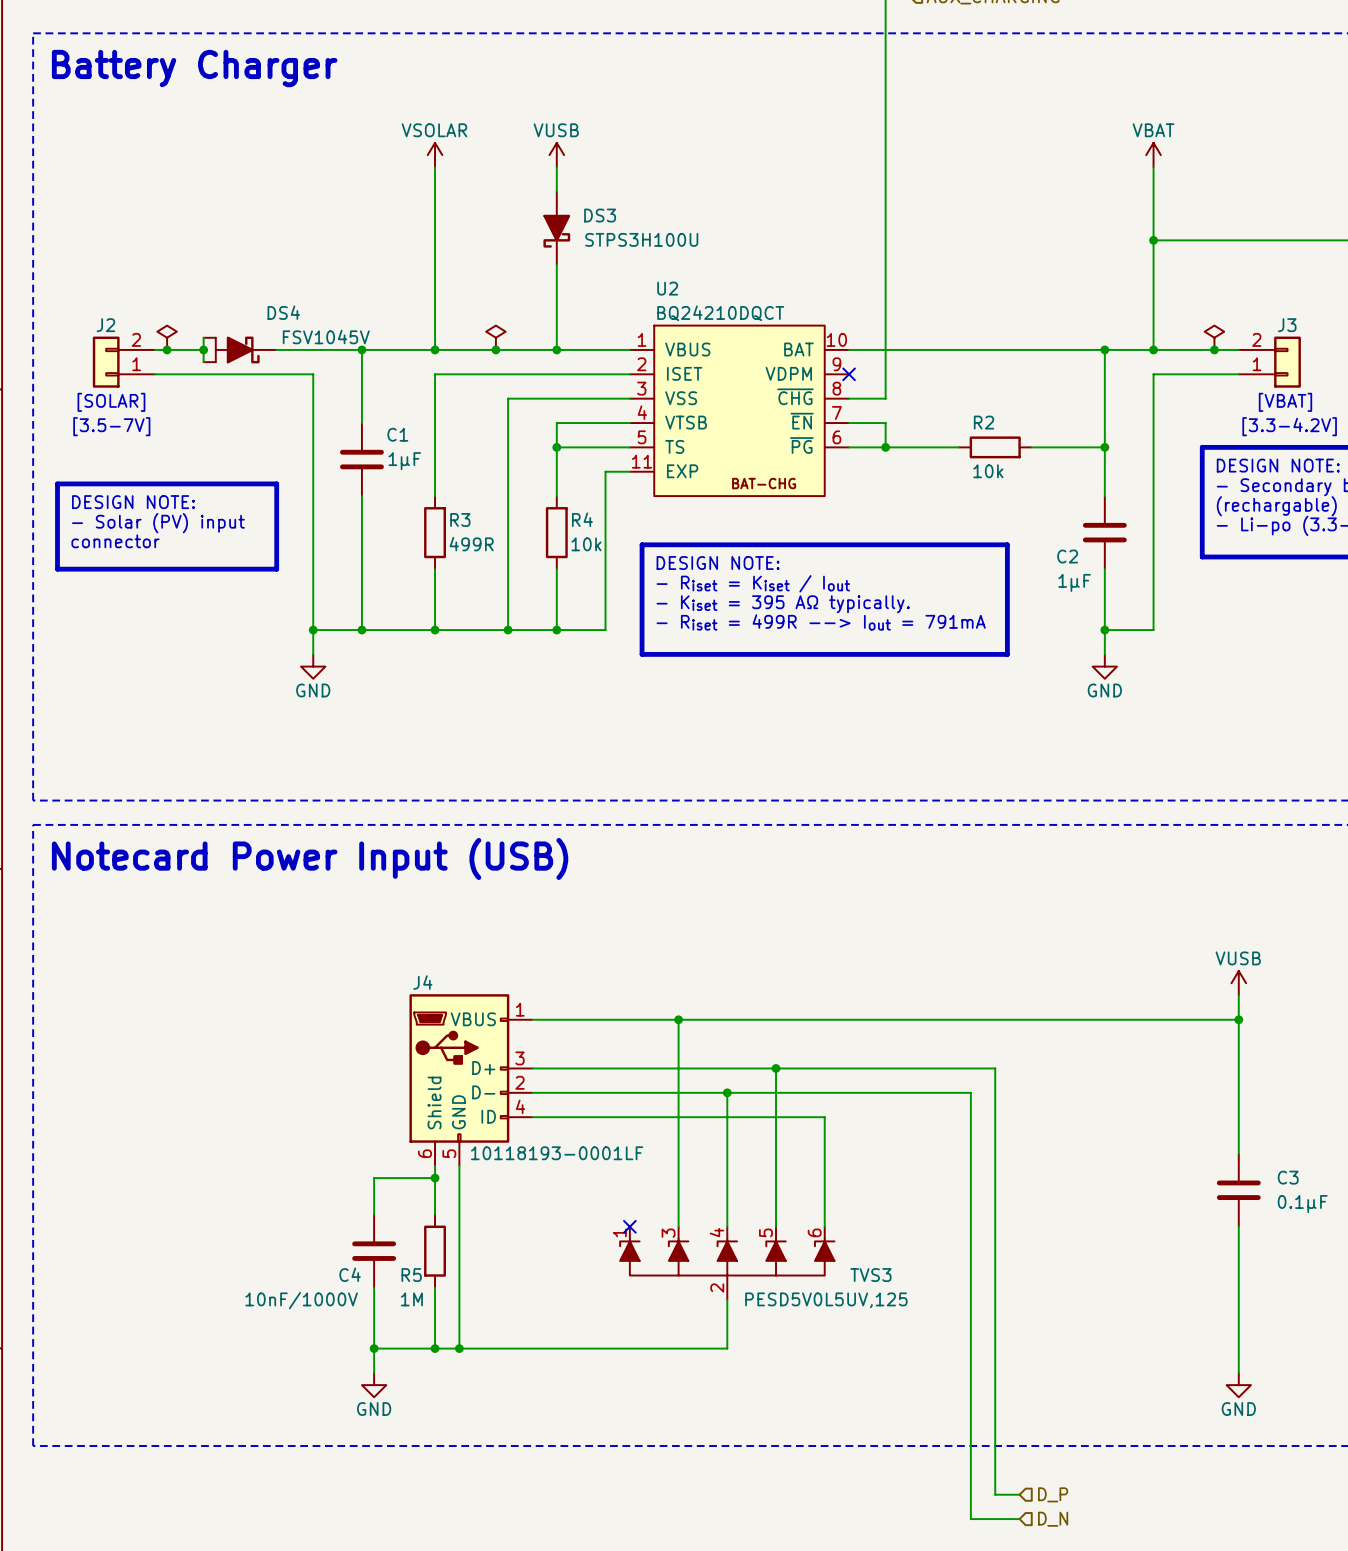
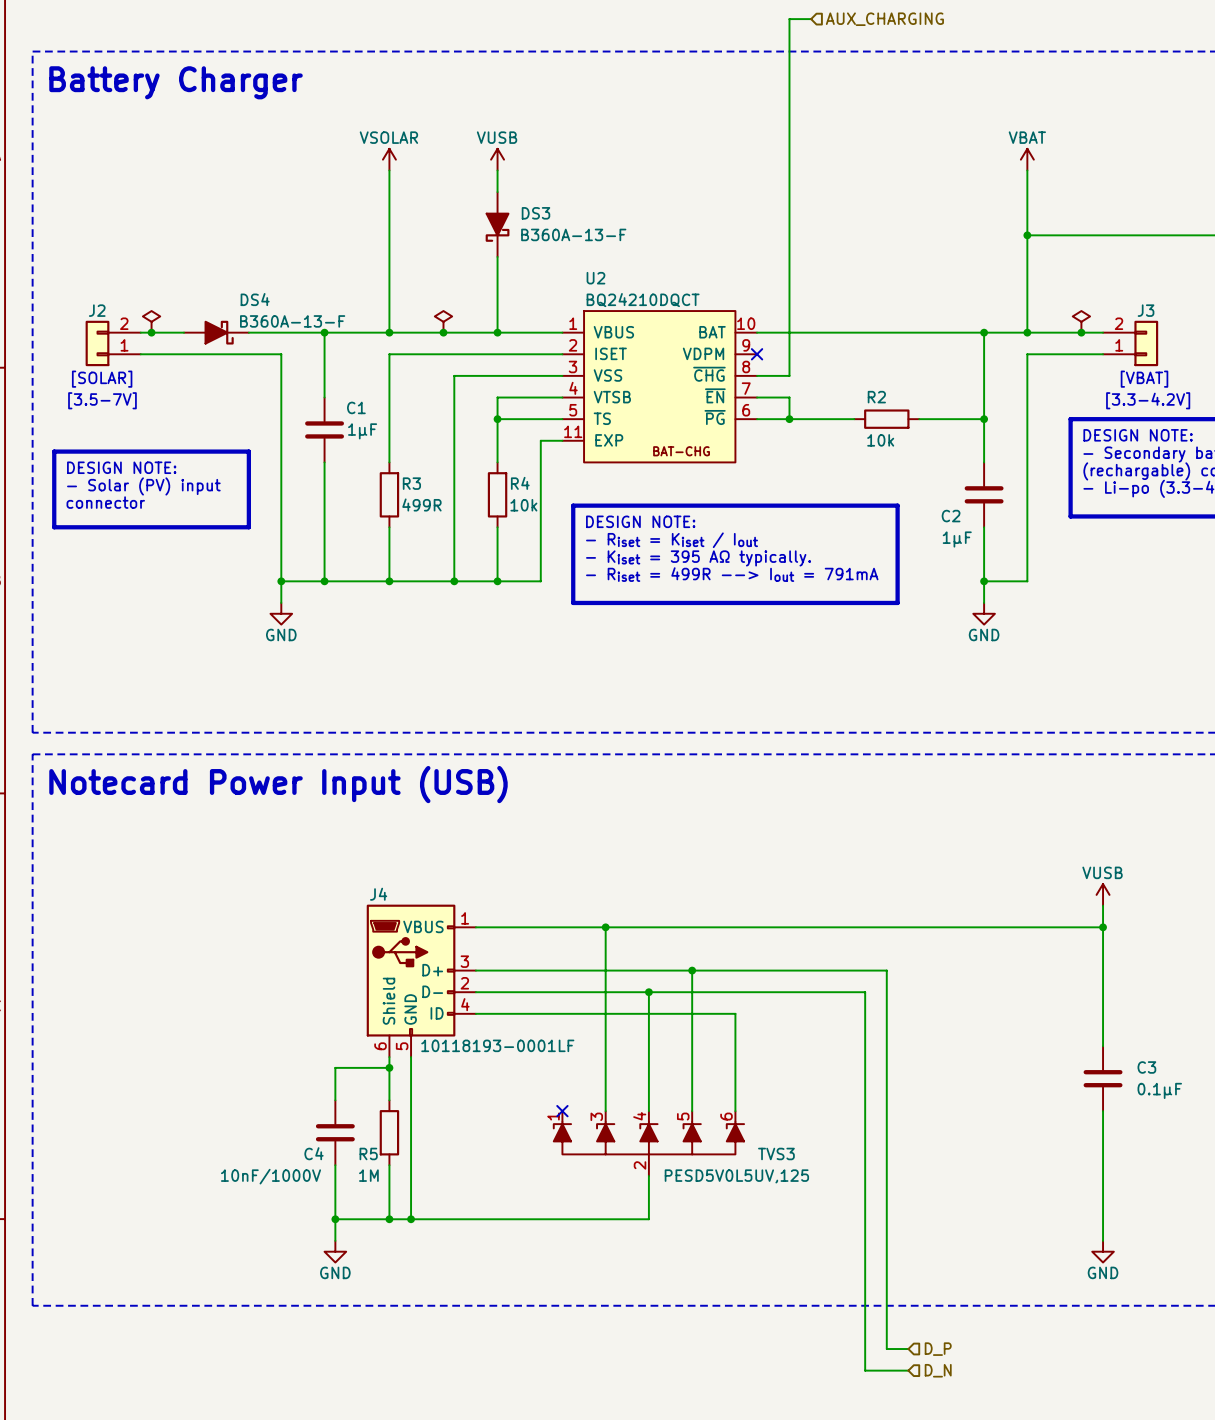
DS3 value: STPS3H100U (641, 239) -> B360A-13-F (573, 234)
DS4 symbol: [203, 336, 277, 364] -> [183, 320, 249, 345]
wire: (203, 337) (203, 362) -> none
DS4 value: FSV1045V (326, 337) -> B360A-13-F (292, 321)
junction: (203, 349) -> none

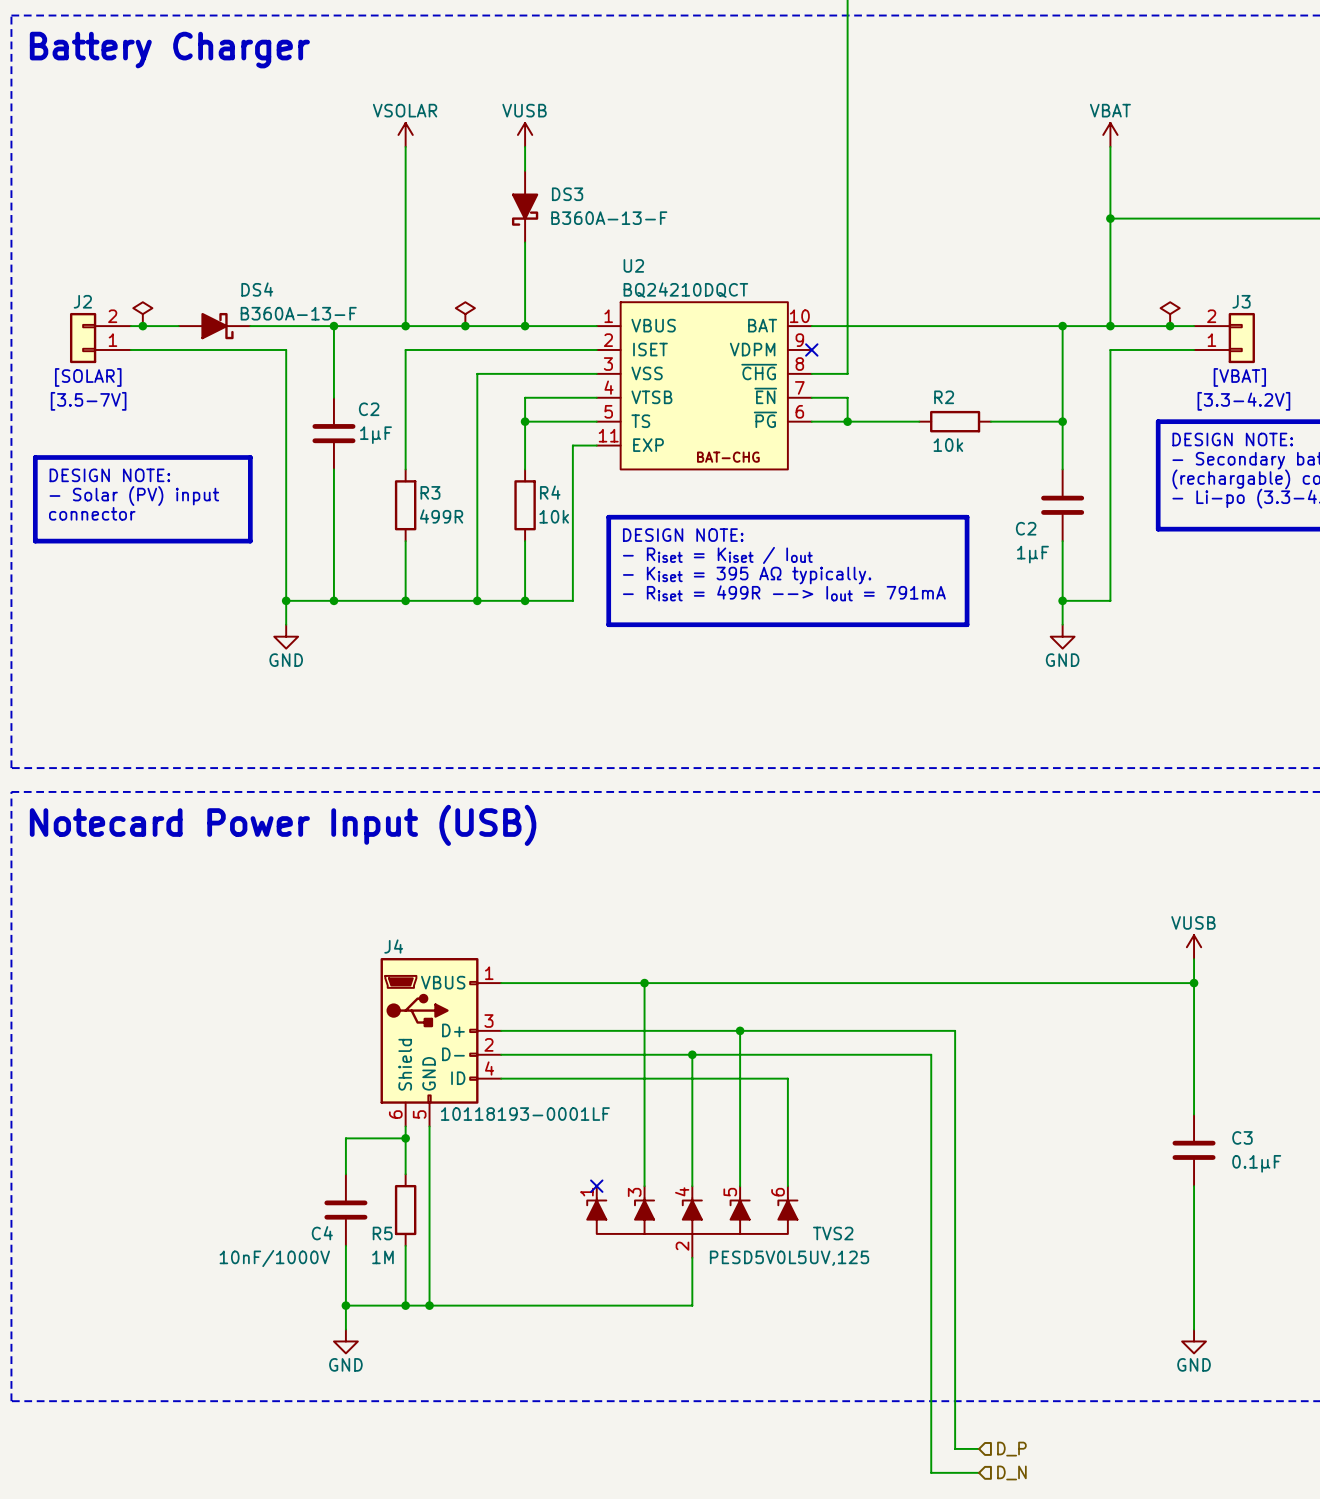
C1 name: C1 (356, 407) -> C2 (369, 409)
TVS3 name: TVS3 (776, 1153) -> TVS2 (833, 1233)

